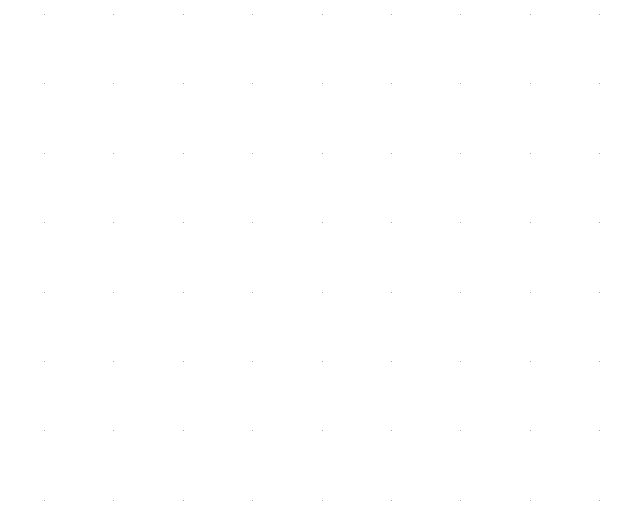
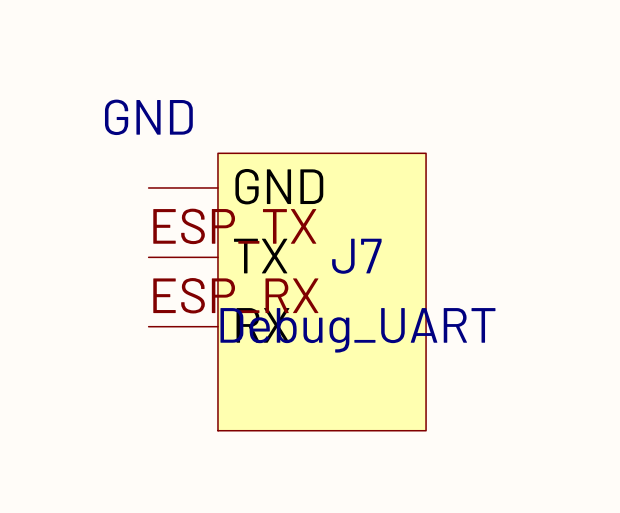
power symbol: none -> GND (148, 117)
label: none -> ESP_TX (234, 226)
J7: none -> Debug_UART (287, 292)
label: none -> ESP_RX (235, 295)

